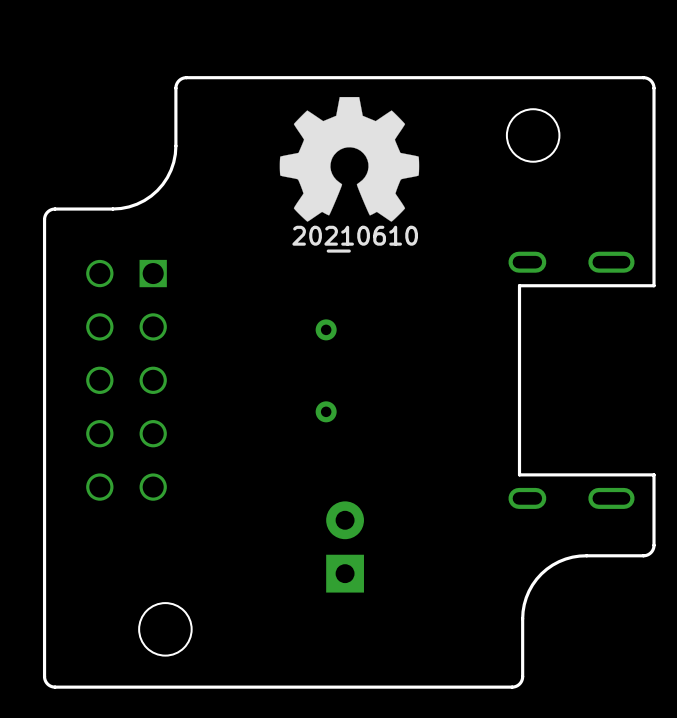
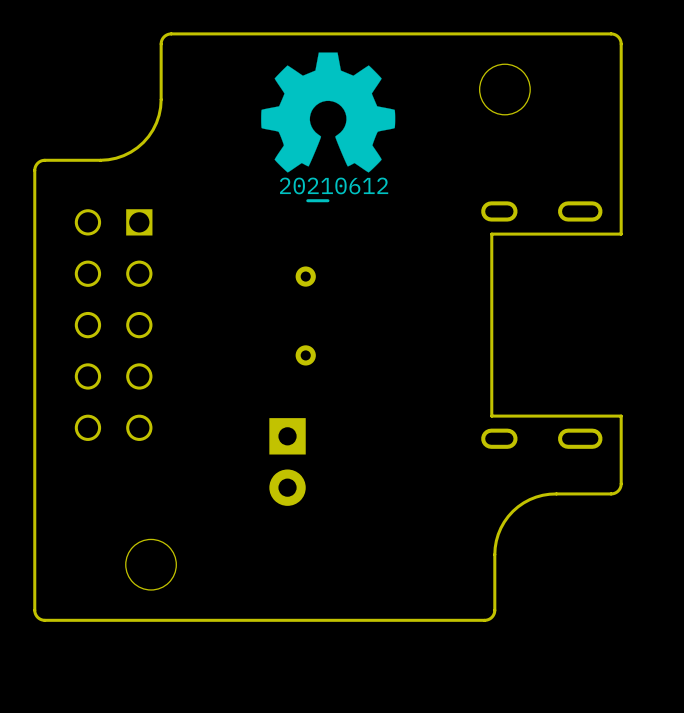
drawing shape: [292, 225, 419, 253] -> [279, 177, 389, 203]
part rotation: 0° (345, 546) -> 180° (287, 461)

